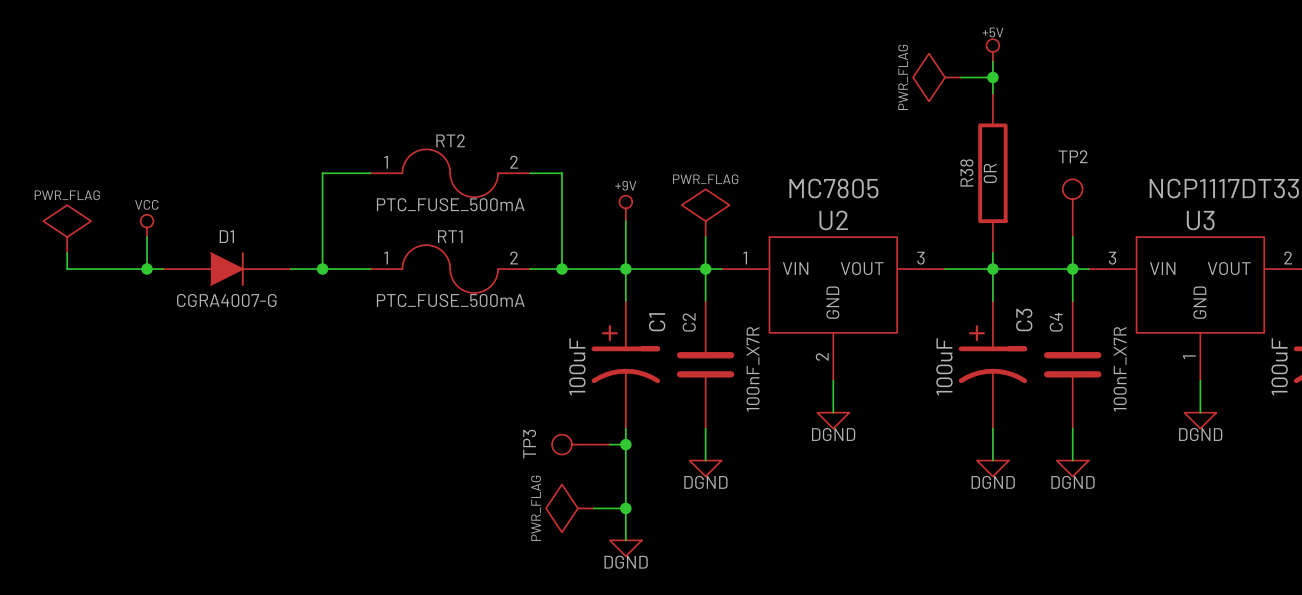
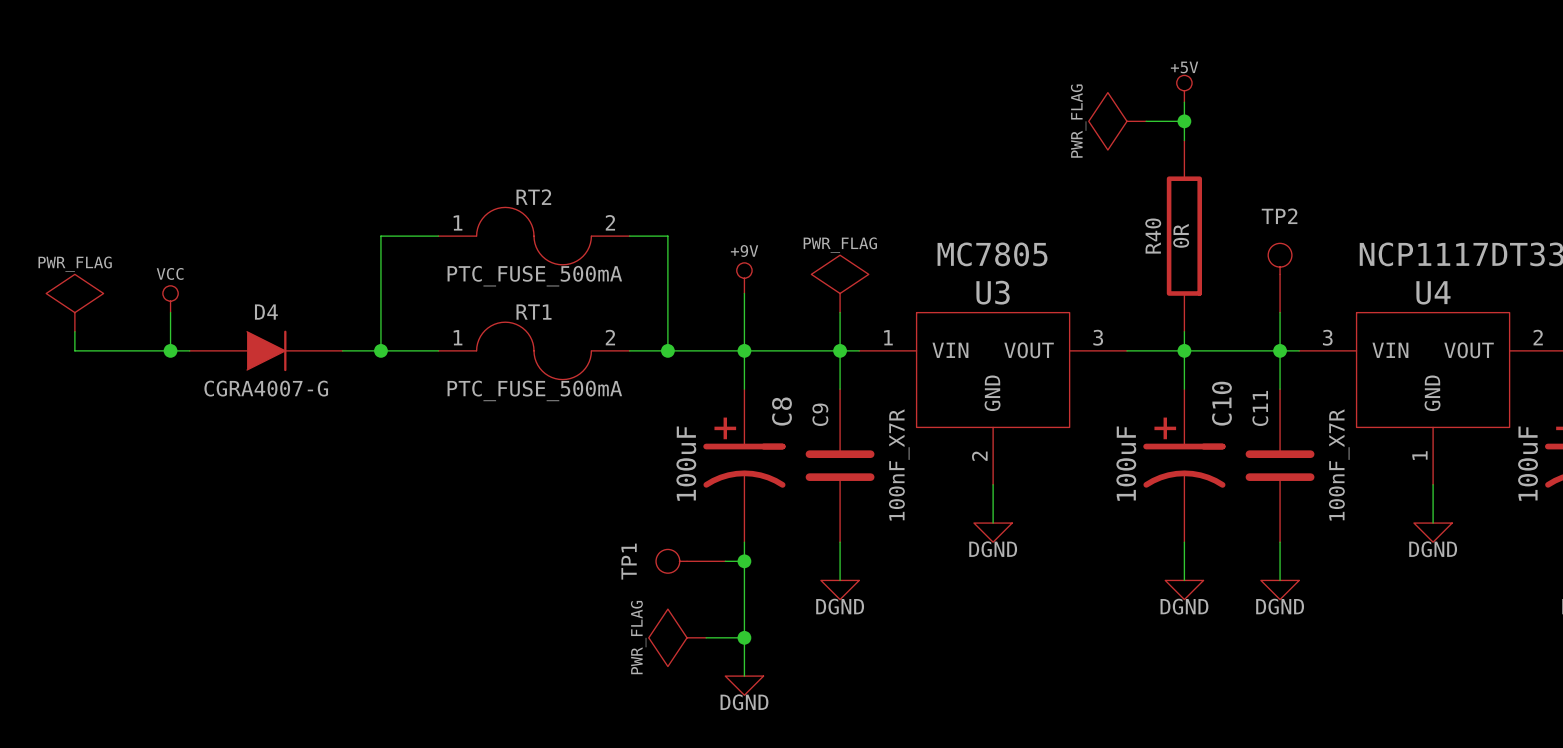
R38 name: R38 (966, 172) -> R40 (1153, 236)
U2 name: U2 (833, 220) -> U3 (993, 292)
U3 name: U3 (1200, 220) -> U4 (1433, 292)
D1 name: D1 (226, 236) -> D4 (266, 312)
C3 name: C3 (1024, 320) -> C10 (1221, 403)
C1 name: C1 (657, 322) -> C8 (781, 411)
C2 name: C2 (689, 322) -> C9 (820, 414)
C4 name: C4 (1056, 322) -> C11 (1260, 408)
TP3 name: TP3 (529, 444) -> TP1 (629, 561)

